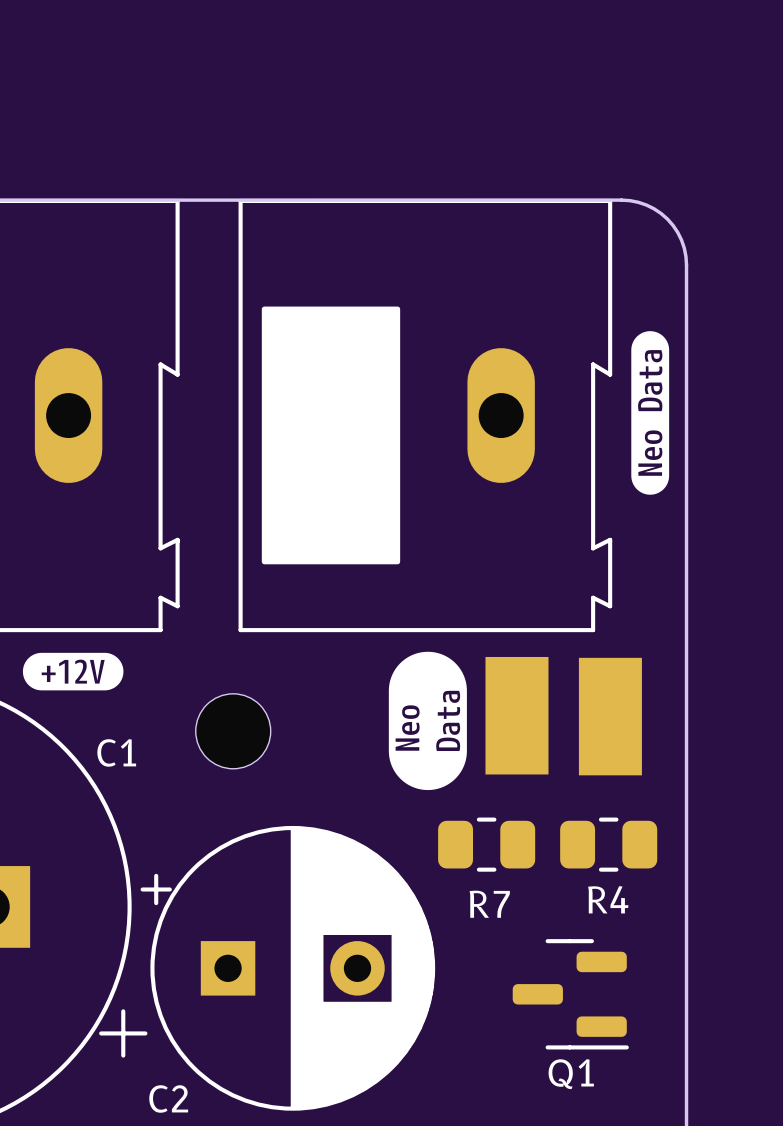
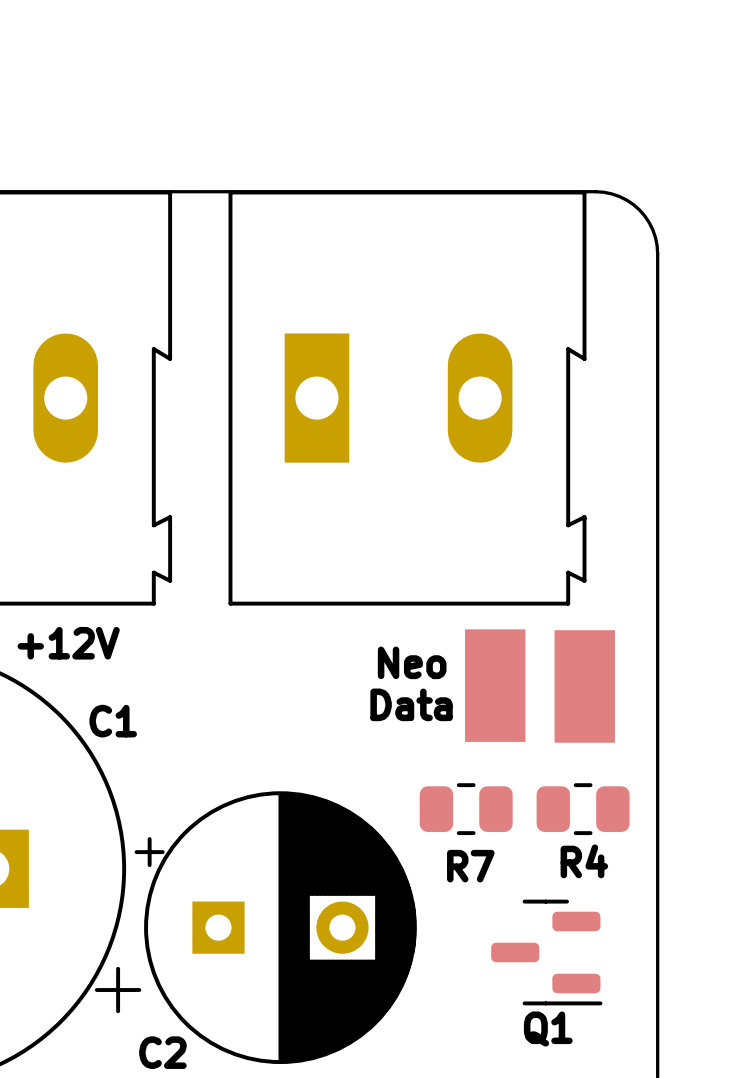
drawing: [261, 306, 401, 565] -> none
drawing: [631, 331, 670, 495] -> none
drawing: [388, 651, 467, 791] -> none
drawing: [22, 652, 124, 691] -> none
text: none -> +12V (68, 643)
text: none -> Neo (412, 662)
part: (233, 731) -> none
text: none -> Data (411, 704)

